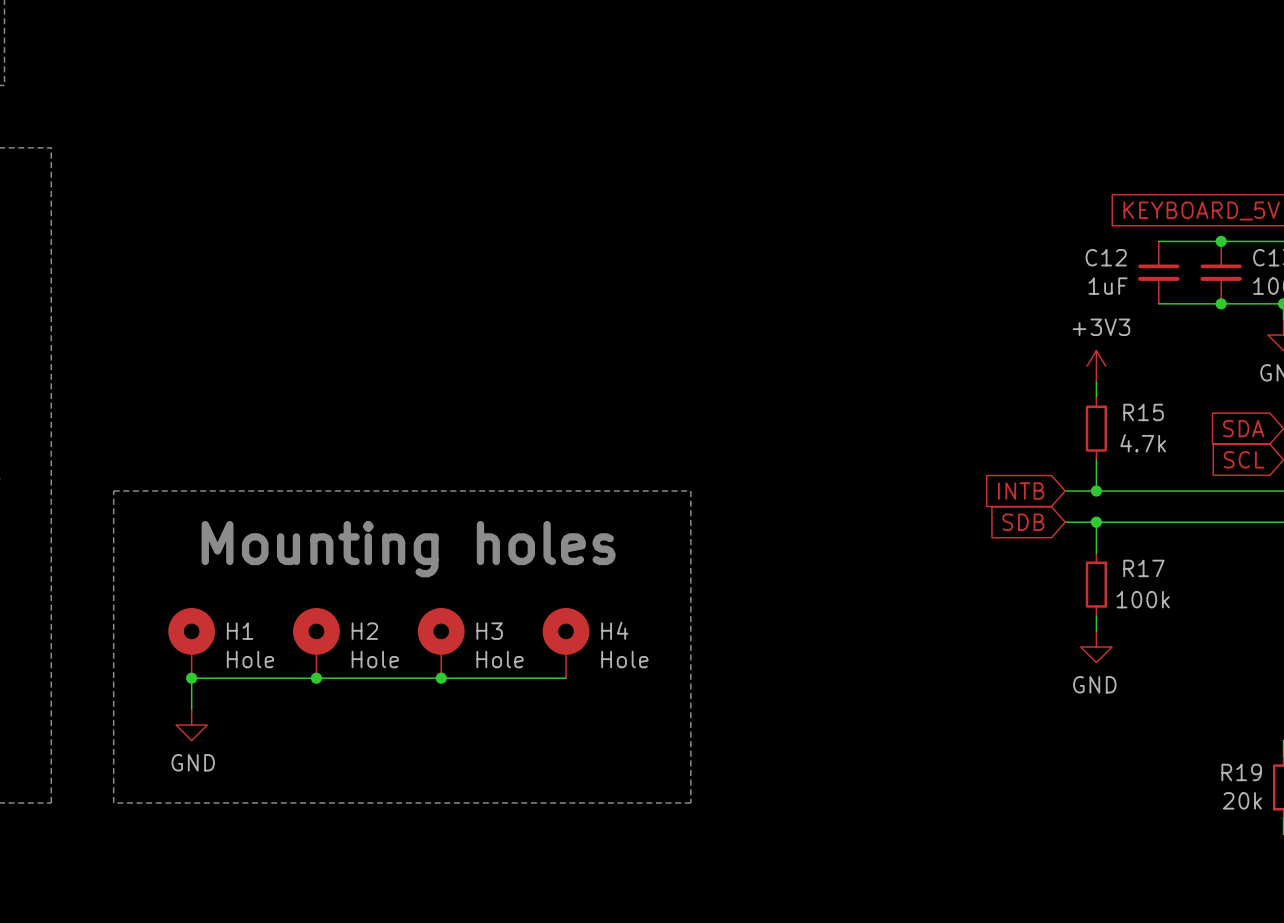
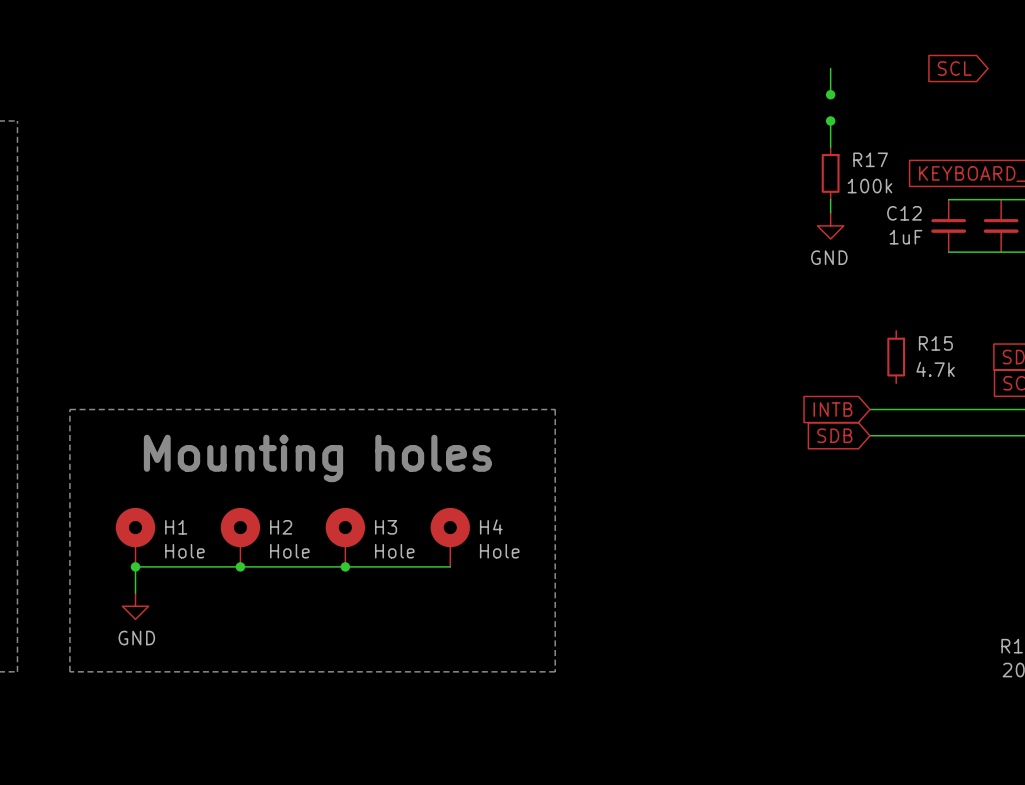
wire: none -> (830, 68) (830, 94)
global label: none -> SCL (954, 68)
junction: none -> (830, 94)
wire: none -> (830, 120) (830, 147)
junction: none -> (830, 120)
junction: (1221, 241) -> none
power symbol: none -> GND (830, 225)
junction: (1221, 303) -> none
power symbol: +3V3 (1096, 366) -> none
wire: (1096, 381) (1096, 397) -> (830, 199) (830, 212)
wire: (1096, 459) (1096, 491) -> none
junction: (1096, 491) -> none
wire: (1096, 522) (1096, 553) -> none
junction: (1096, 522) -> none
R17 position: (1096, 584) -> (830, 173)
wire: (1096, 615) (1096, 631) -> none
power symbol: GND (1096, 647) -> none

